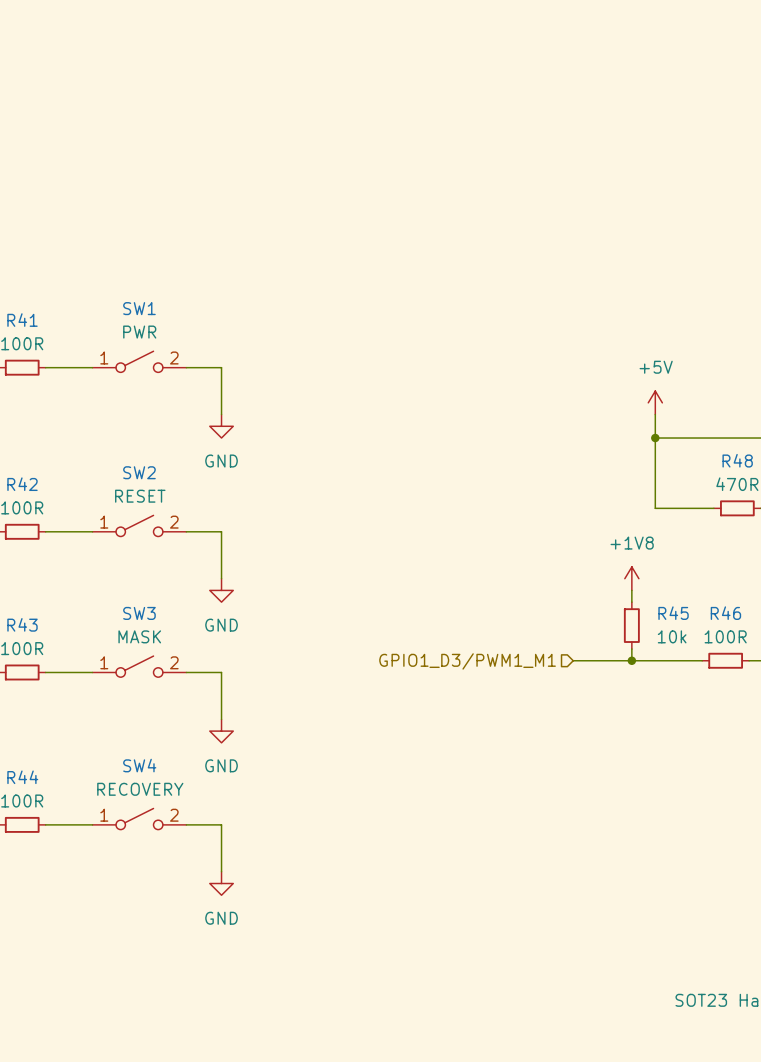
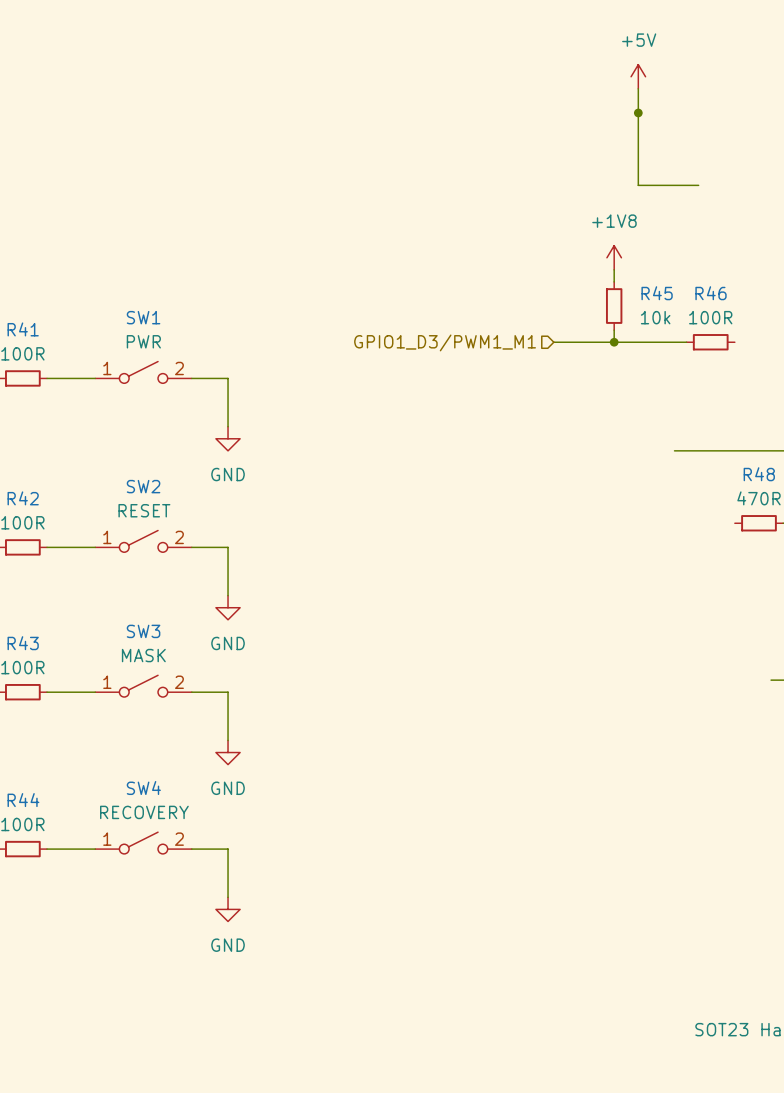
power symbol: none -> +5V (638, 76)
wire: none -> (638, 88) (638, 185) (698, 185)
junction: none -> (638, 112)
power symbol: none -> +1V8 (614, 257)
wire: none -> (614, 269) (614, 281)
wire: none -> (614, 330) (614, 342)
wire: none -> (553, 342) (686, 342)
junction: none -> (614, 342)
hierarchical label: none -> GPIO1_D3/PWM1_M1 (445, 342)
power symbol: +5V (655, 402) -> none
wire: (655, 414) (655, 508) (713, 508) -> none
junction: (655, 438) -> none
power symbol: +1V8 (631, 578) -> none
wire: (631, 590) (631, 602) -> none
R45 position: (631, 625) -> (614, 306)
wire: (631, 649) (631, 660) -> none
wire: (573, 660) (702, 660) -> none
junction: (631, 660) -> none
R46 position: (725, 660) -> (710, 342)
hierarchical label: GPIO1_D3/PWM1_M1 (467, 661) -> none

